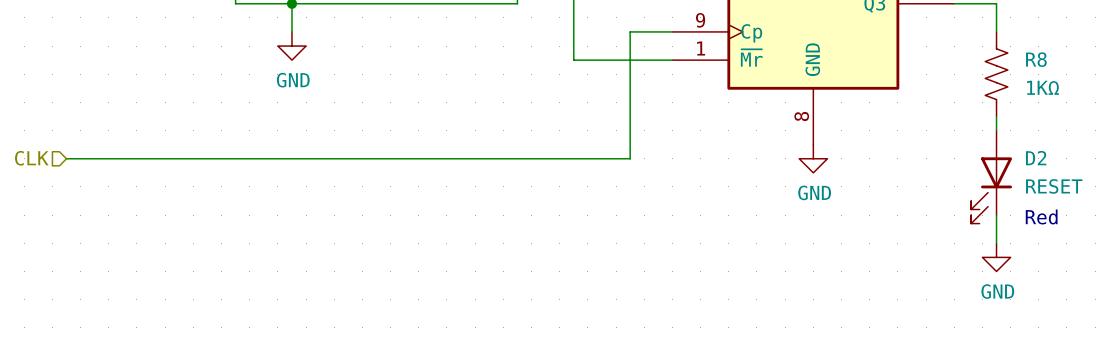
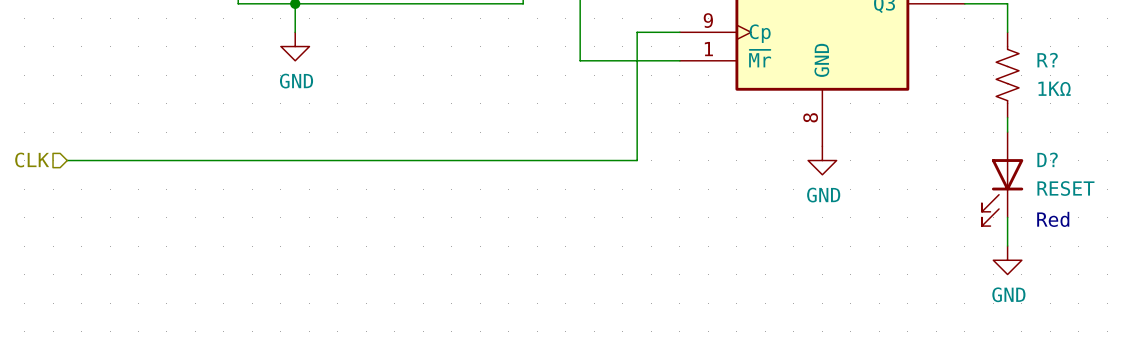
R8 name: R8 (1036, 59) -> R? (1047, 60)
D2 name: D2 (1036, 158) -> D? (1047, 159)

